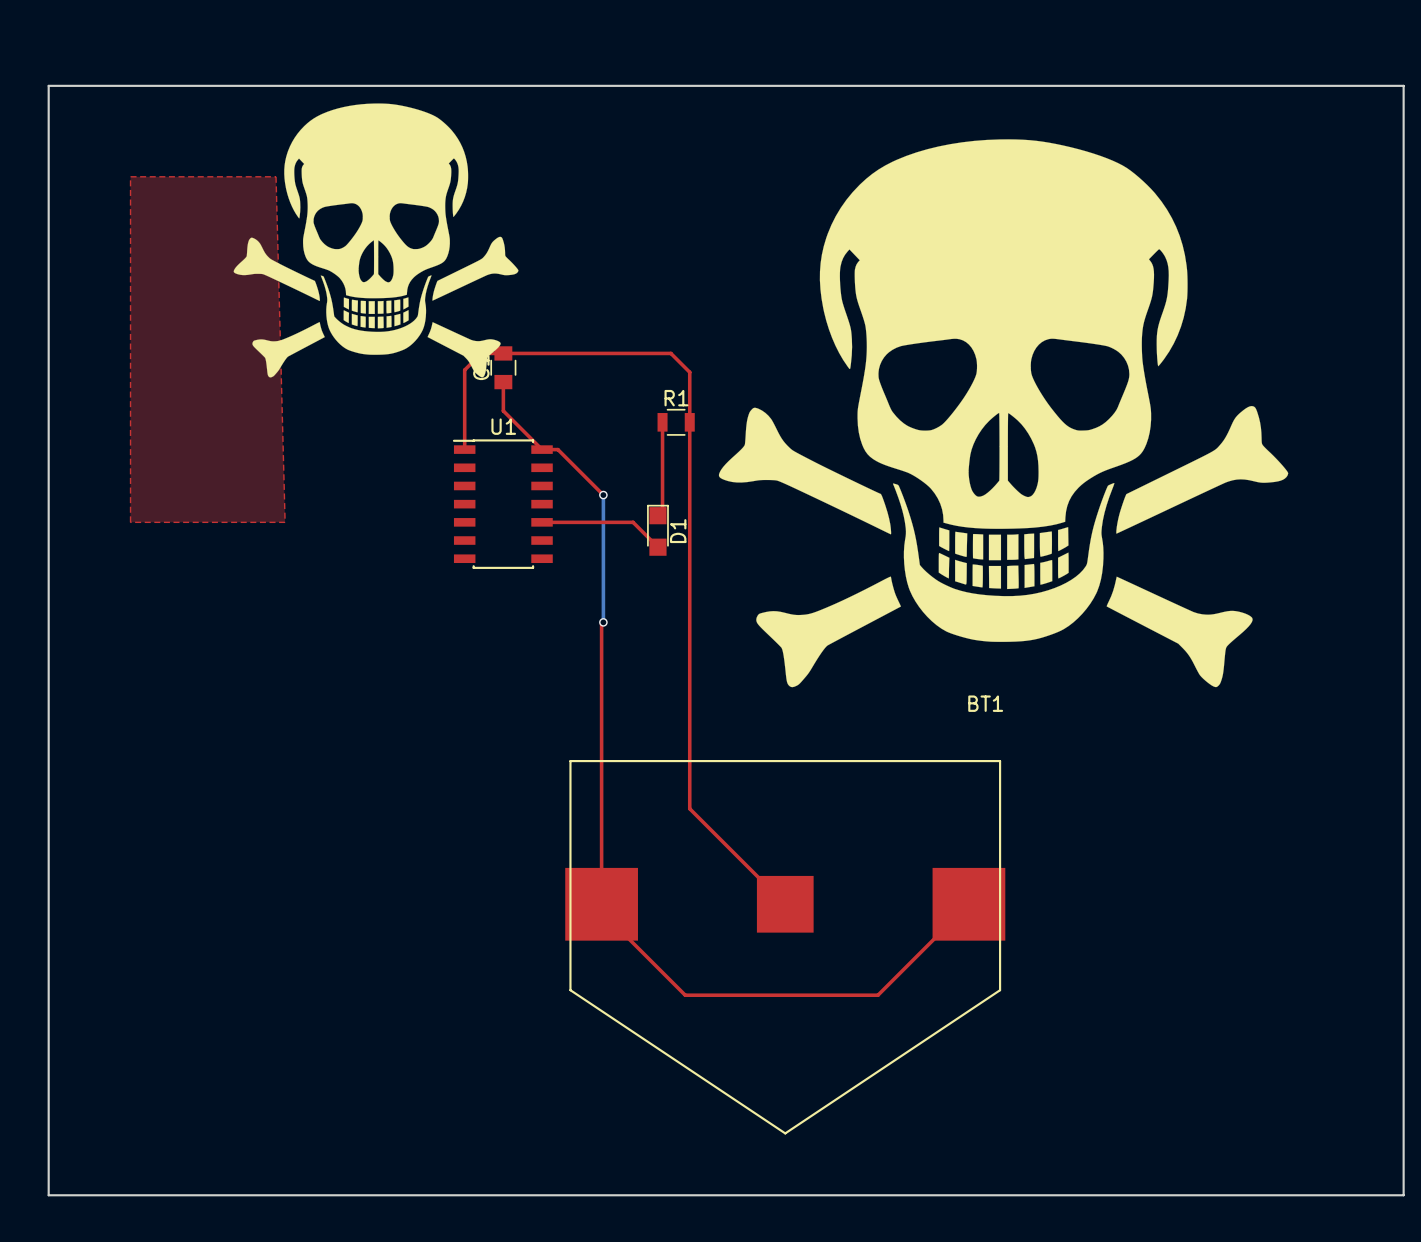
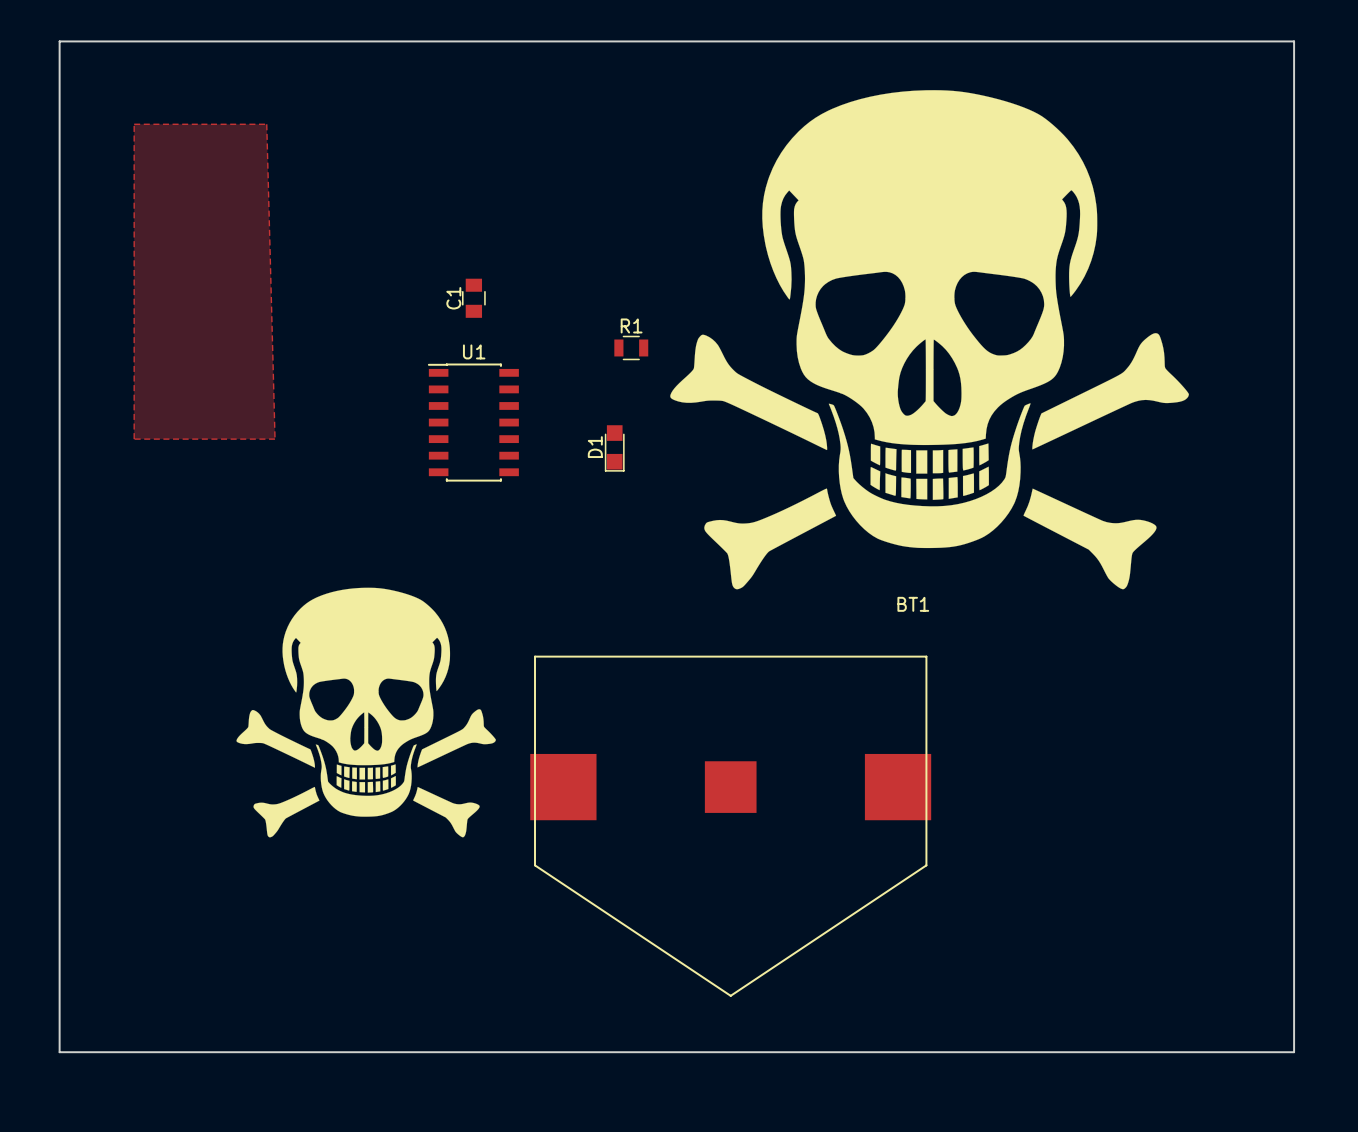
drawing: [233, 103, 519, 378] -> none
top track: (503, 382) (503, 410) (542, 449) (557, 449) (603, 495) -> none
top track: (662, 422) (662, 511) (657, 515) -> none
top track: (464, 449) (464, 370) (481, 353) (670, 353) (689, 372) (689, 808) (785, 904) -> none
bottom track: (603, 495) (603, 622) -> none
via: (603, 495) -> none
top track: (542, 522) (633, 522) (657, 547) -> none
D1 rotation: 0° (657, 530) -> 180° (614, 448)
top track: (603, 622) (601, 624) (601, 911) (685, 995) (877, 995) (968, 904) -> none
via: (603, 622) -> none
drawing: none -> [236, 587, 496, 838]

